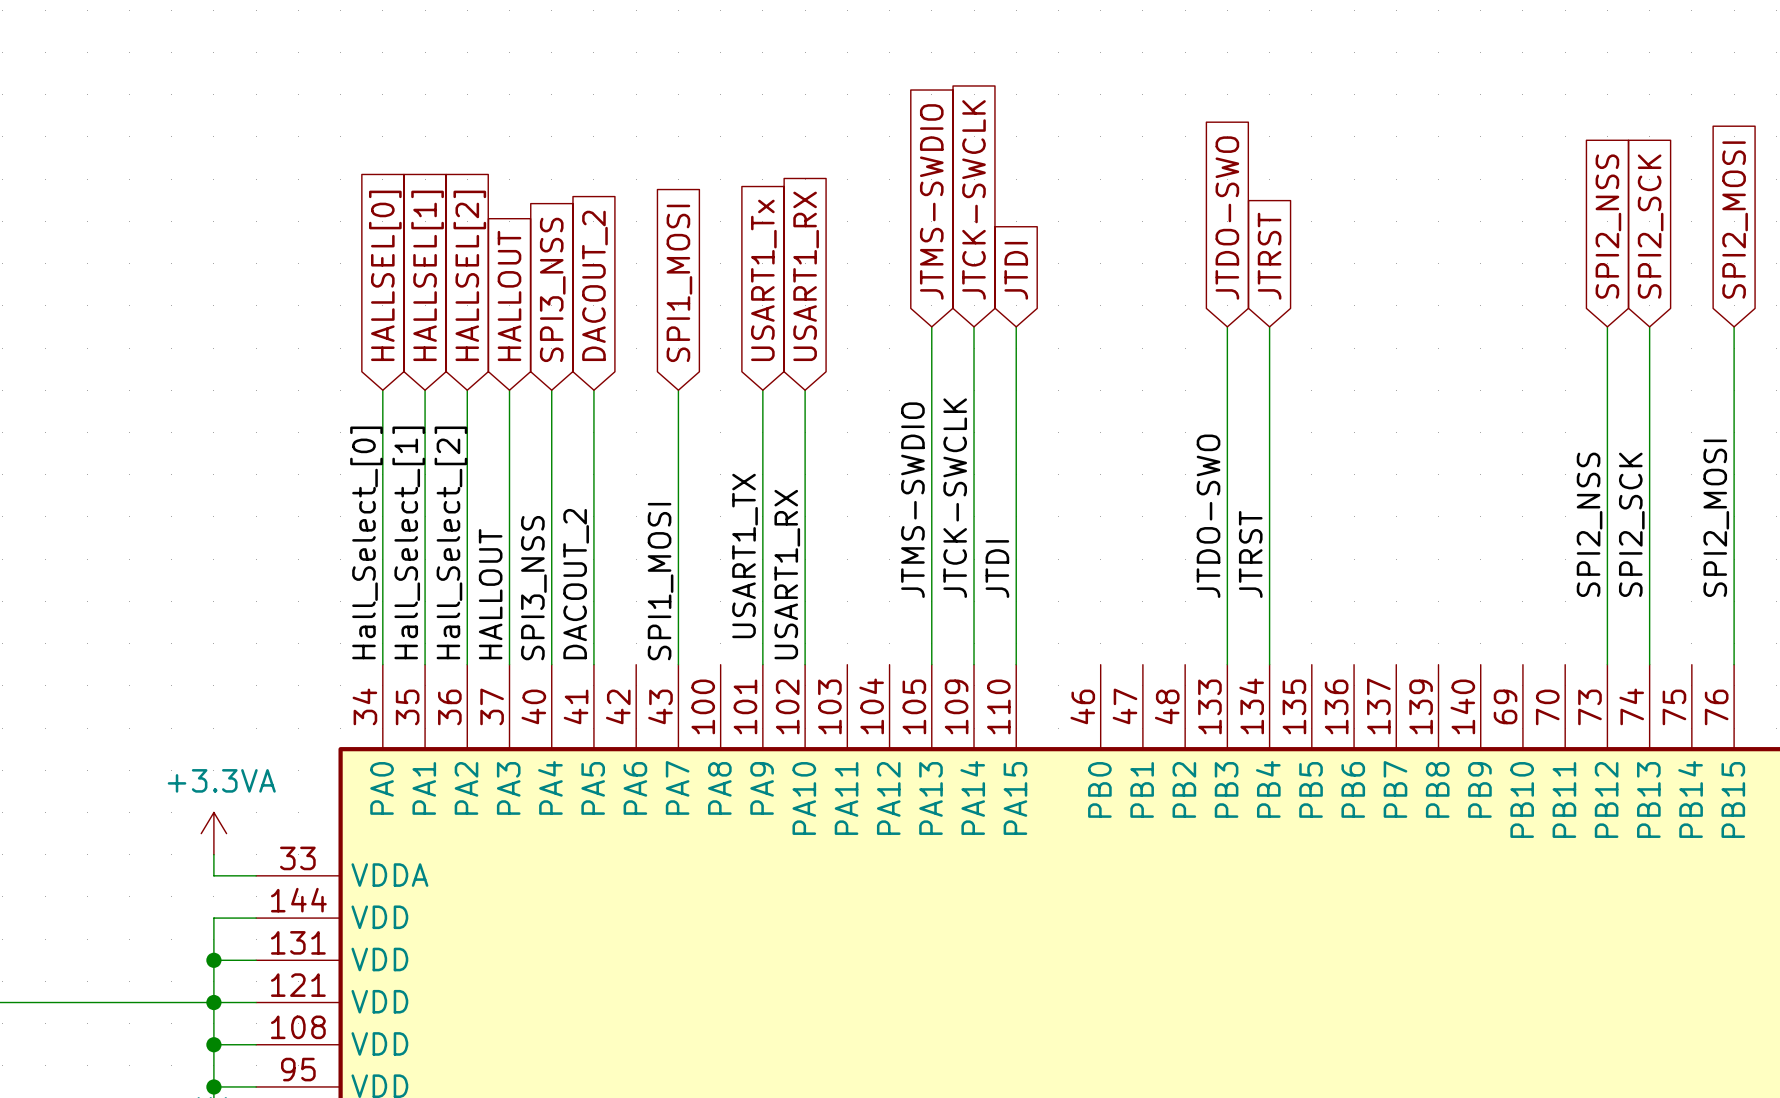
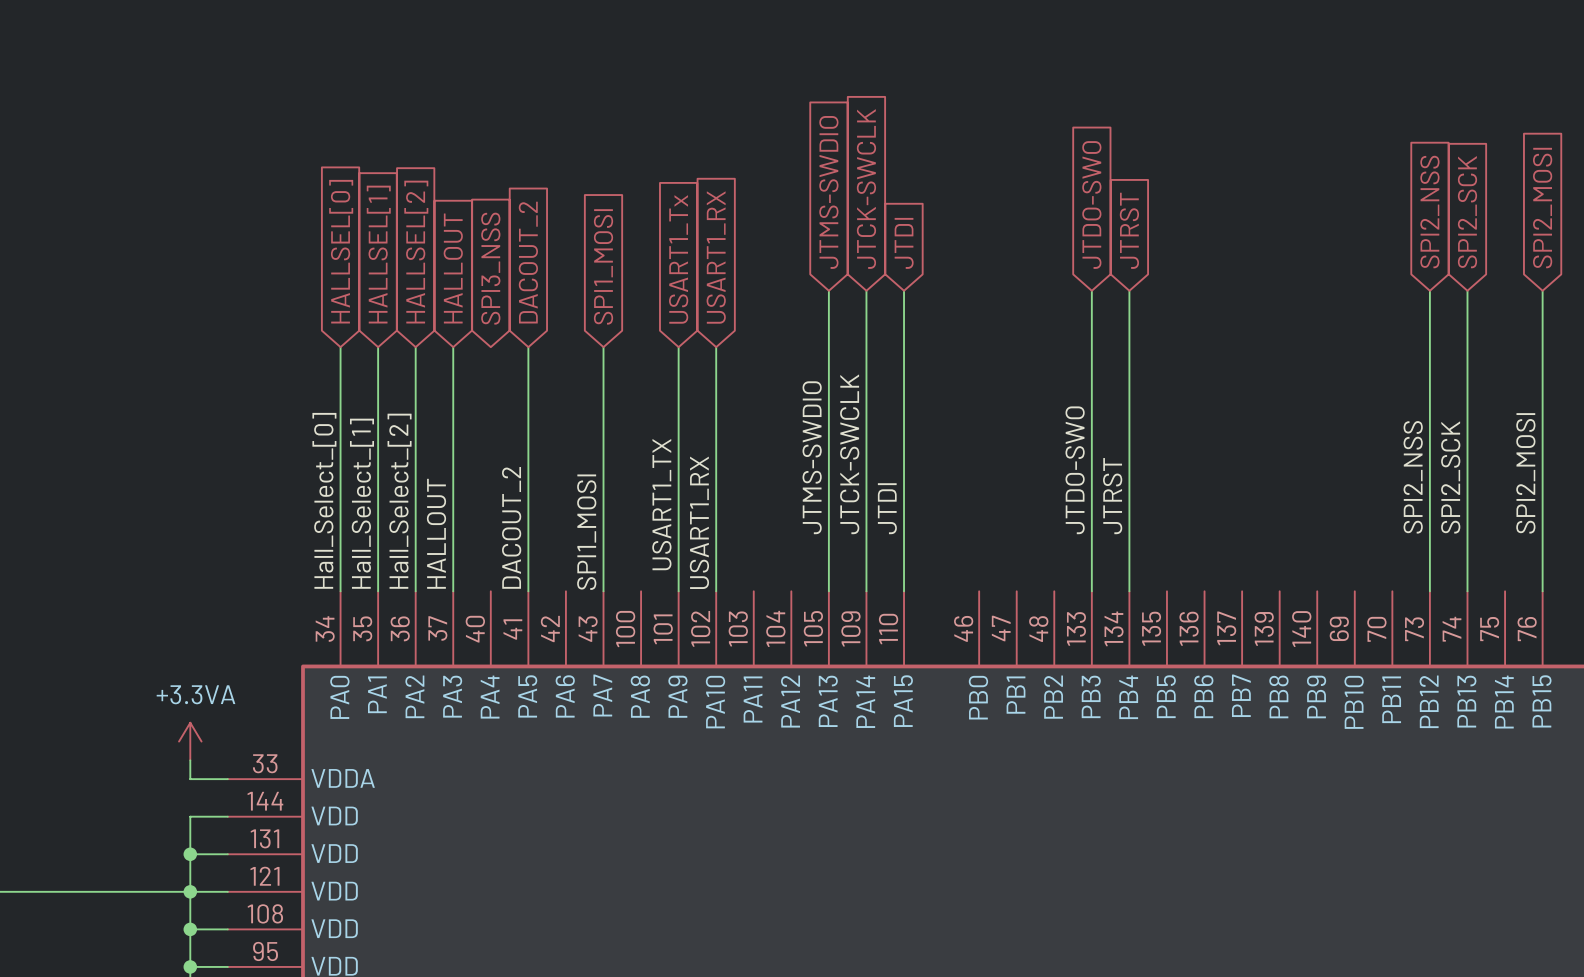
wire: (551, 390) (551, 664) -> none
label: SPI3_NSS (533, 588) -> none

